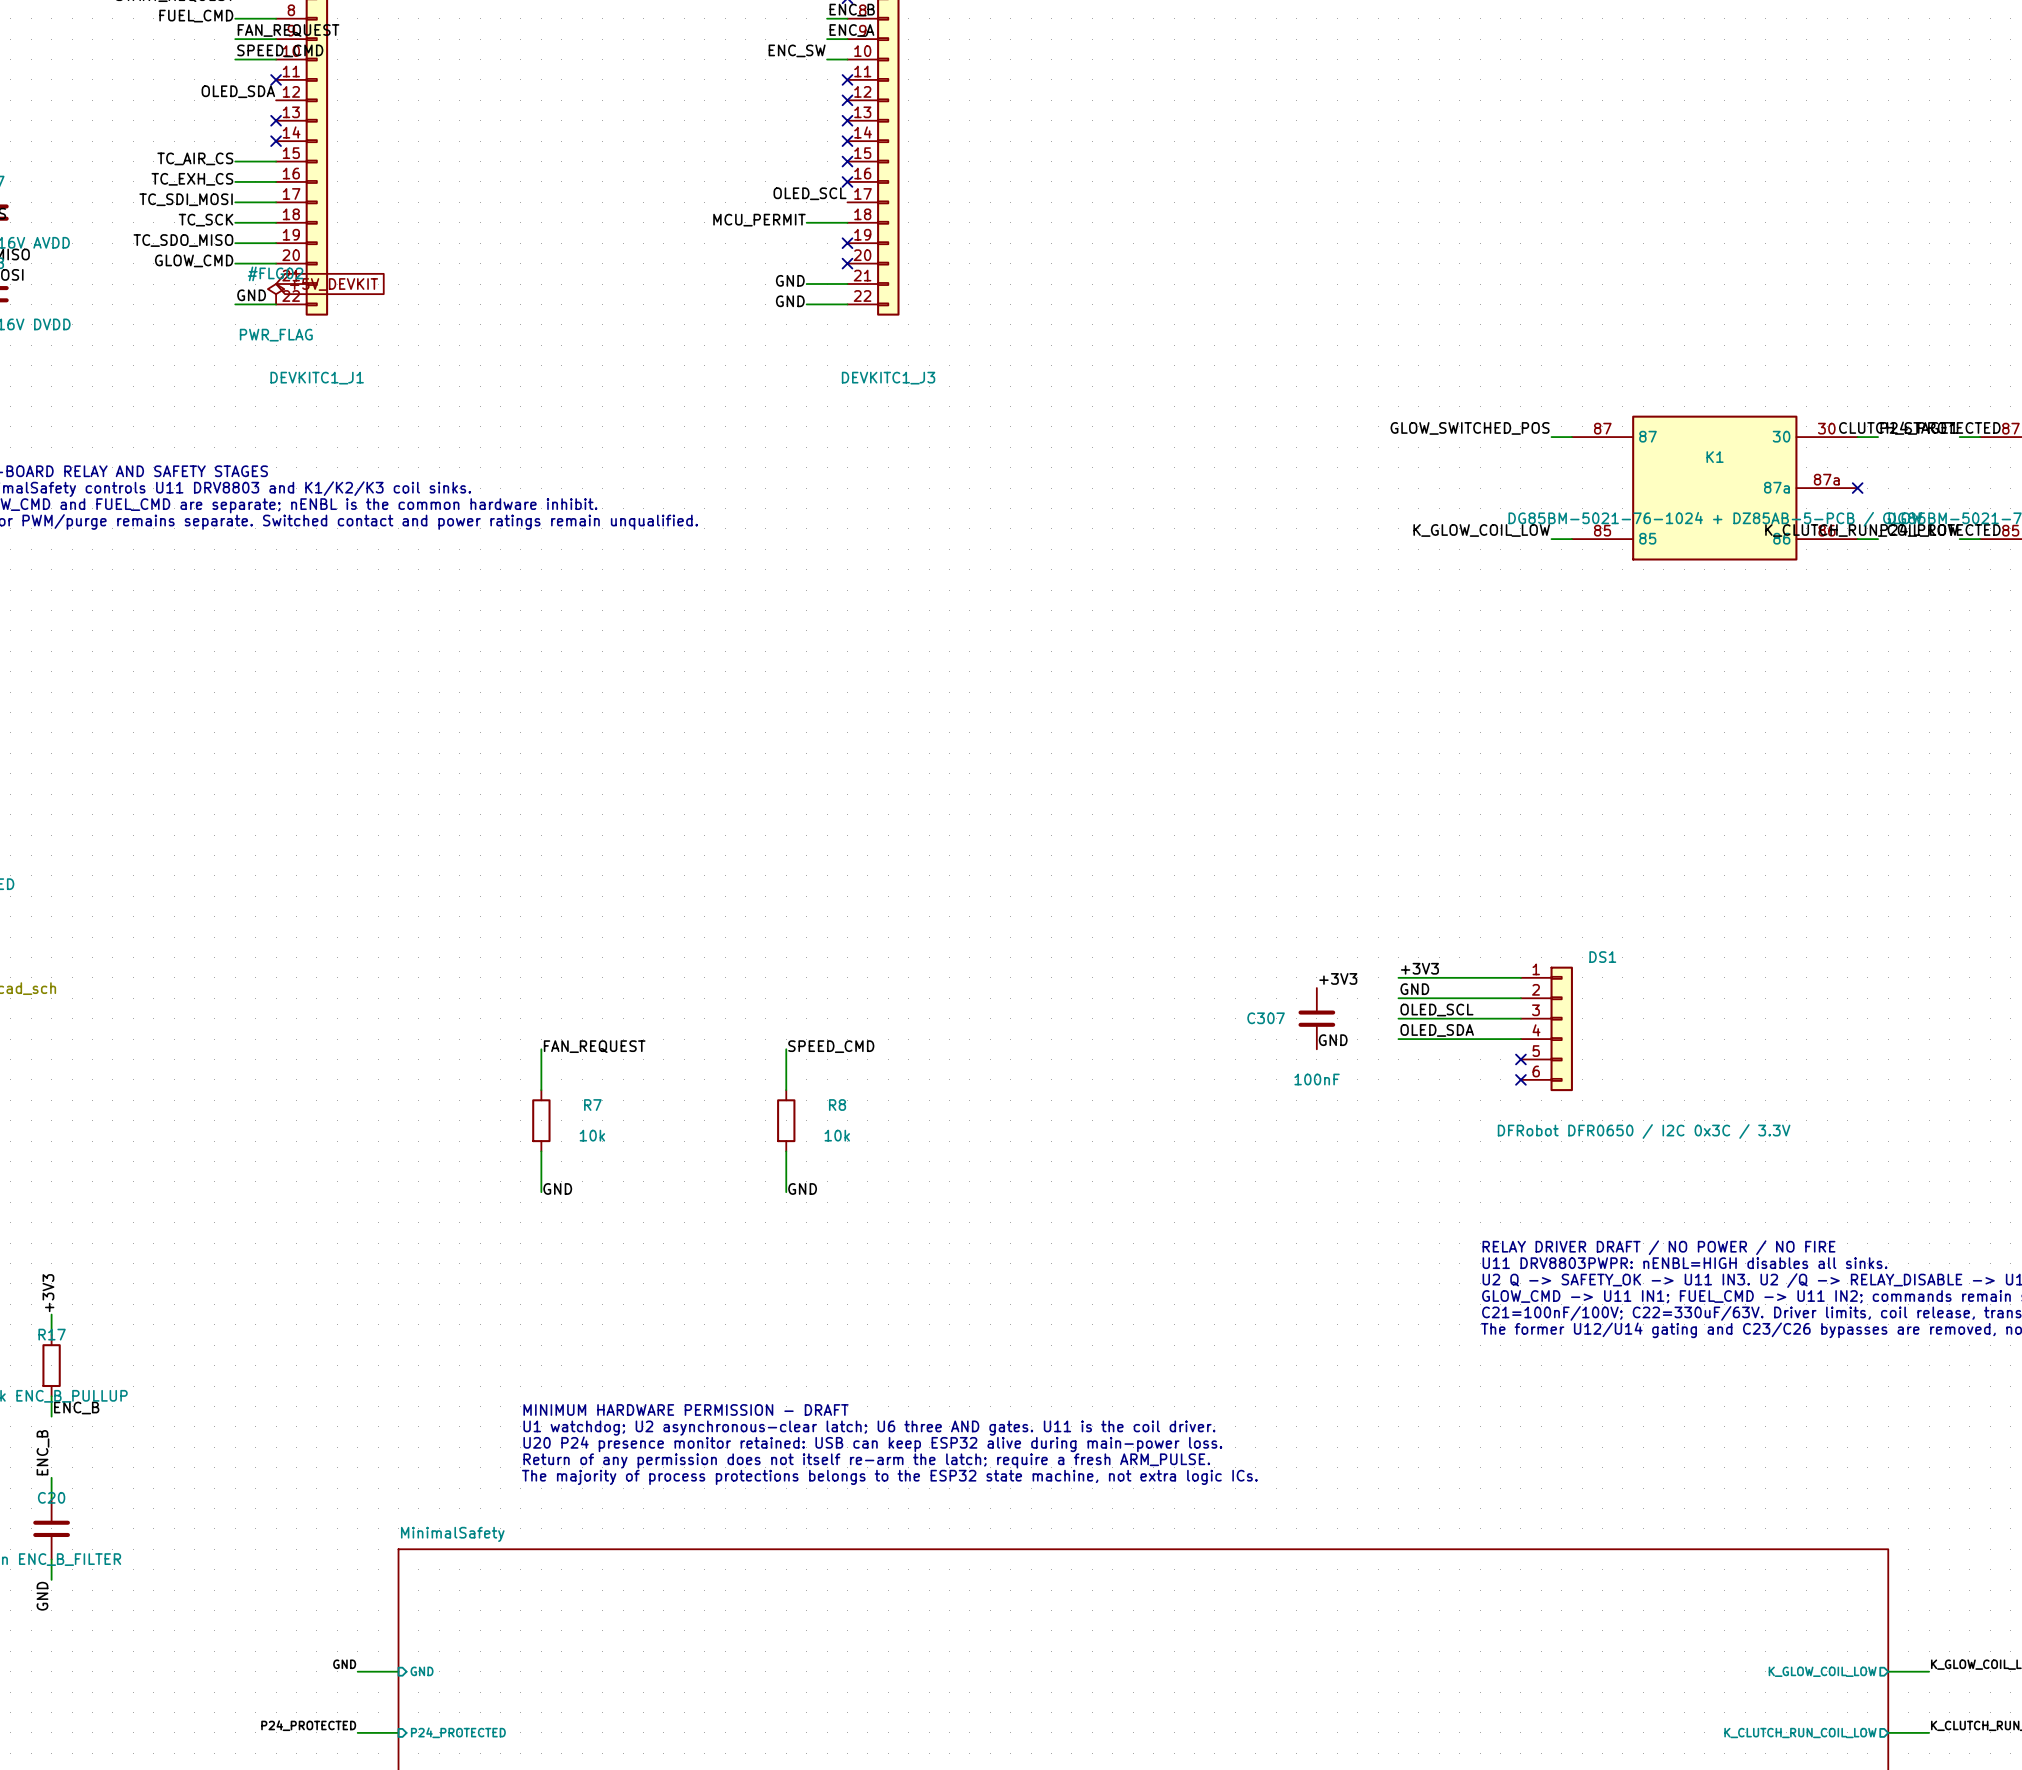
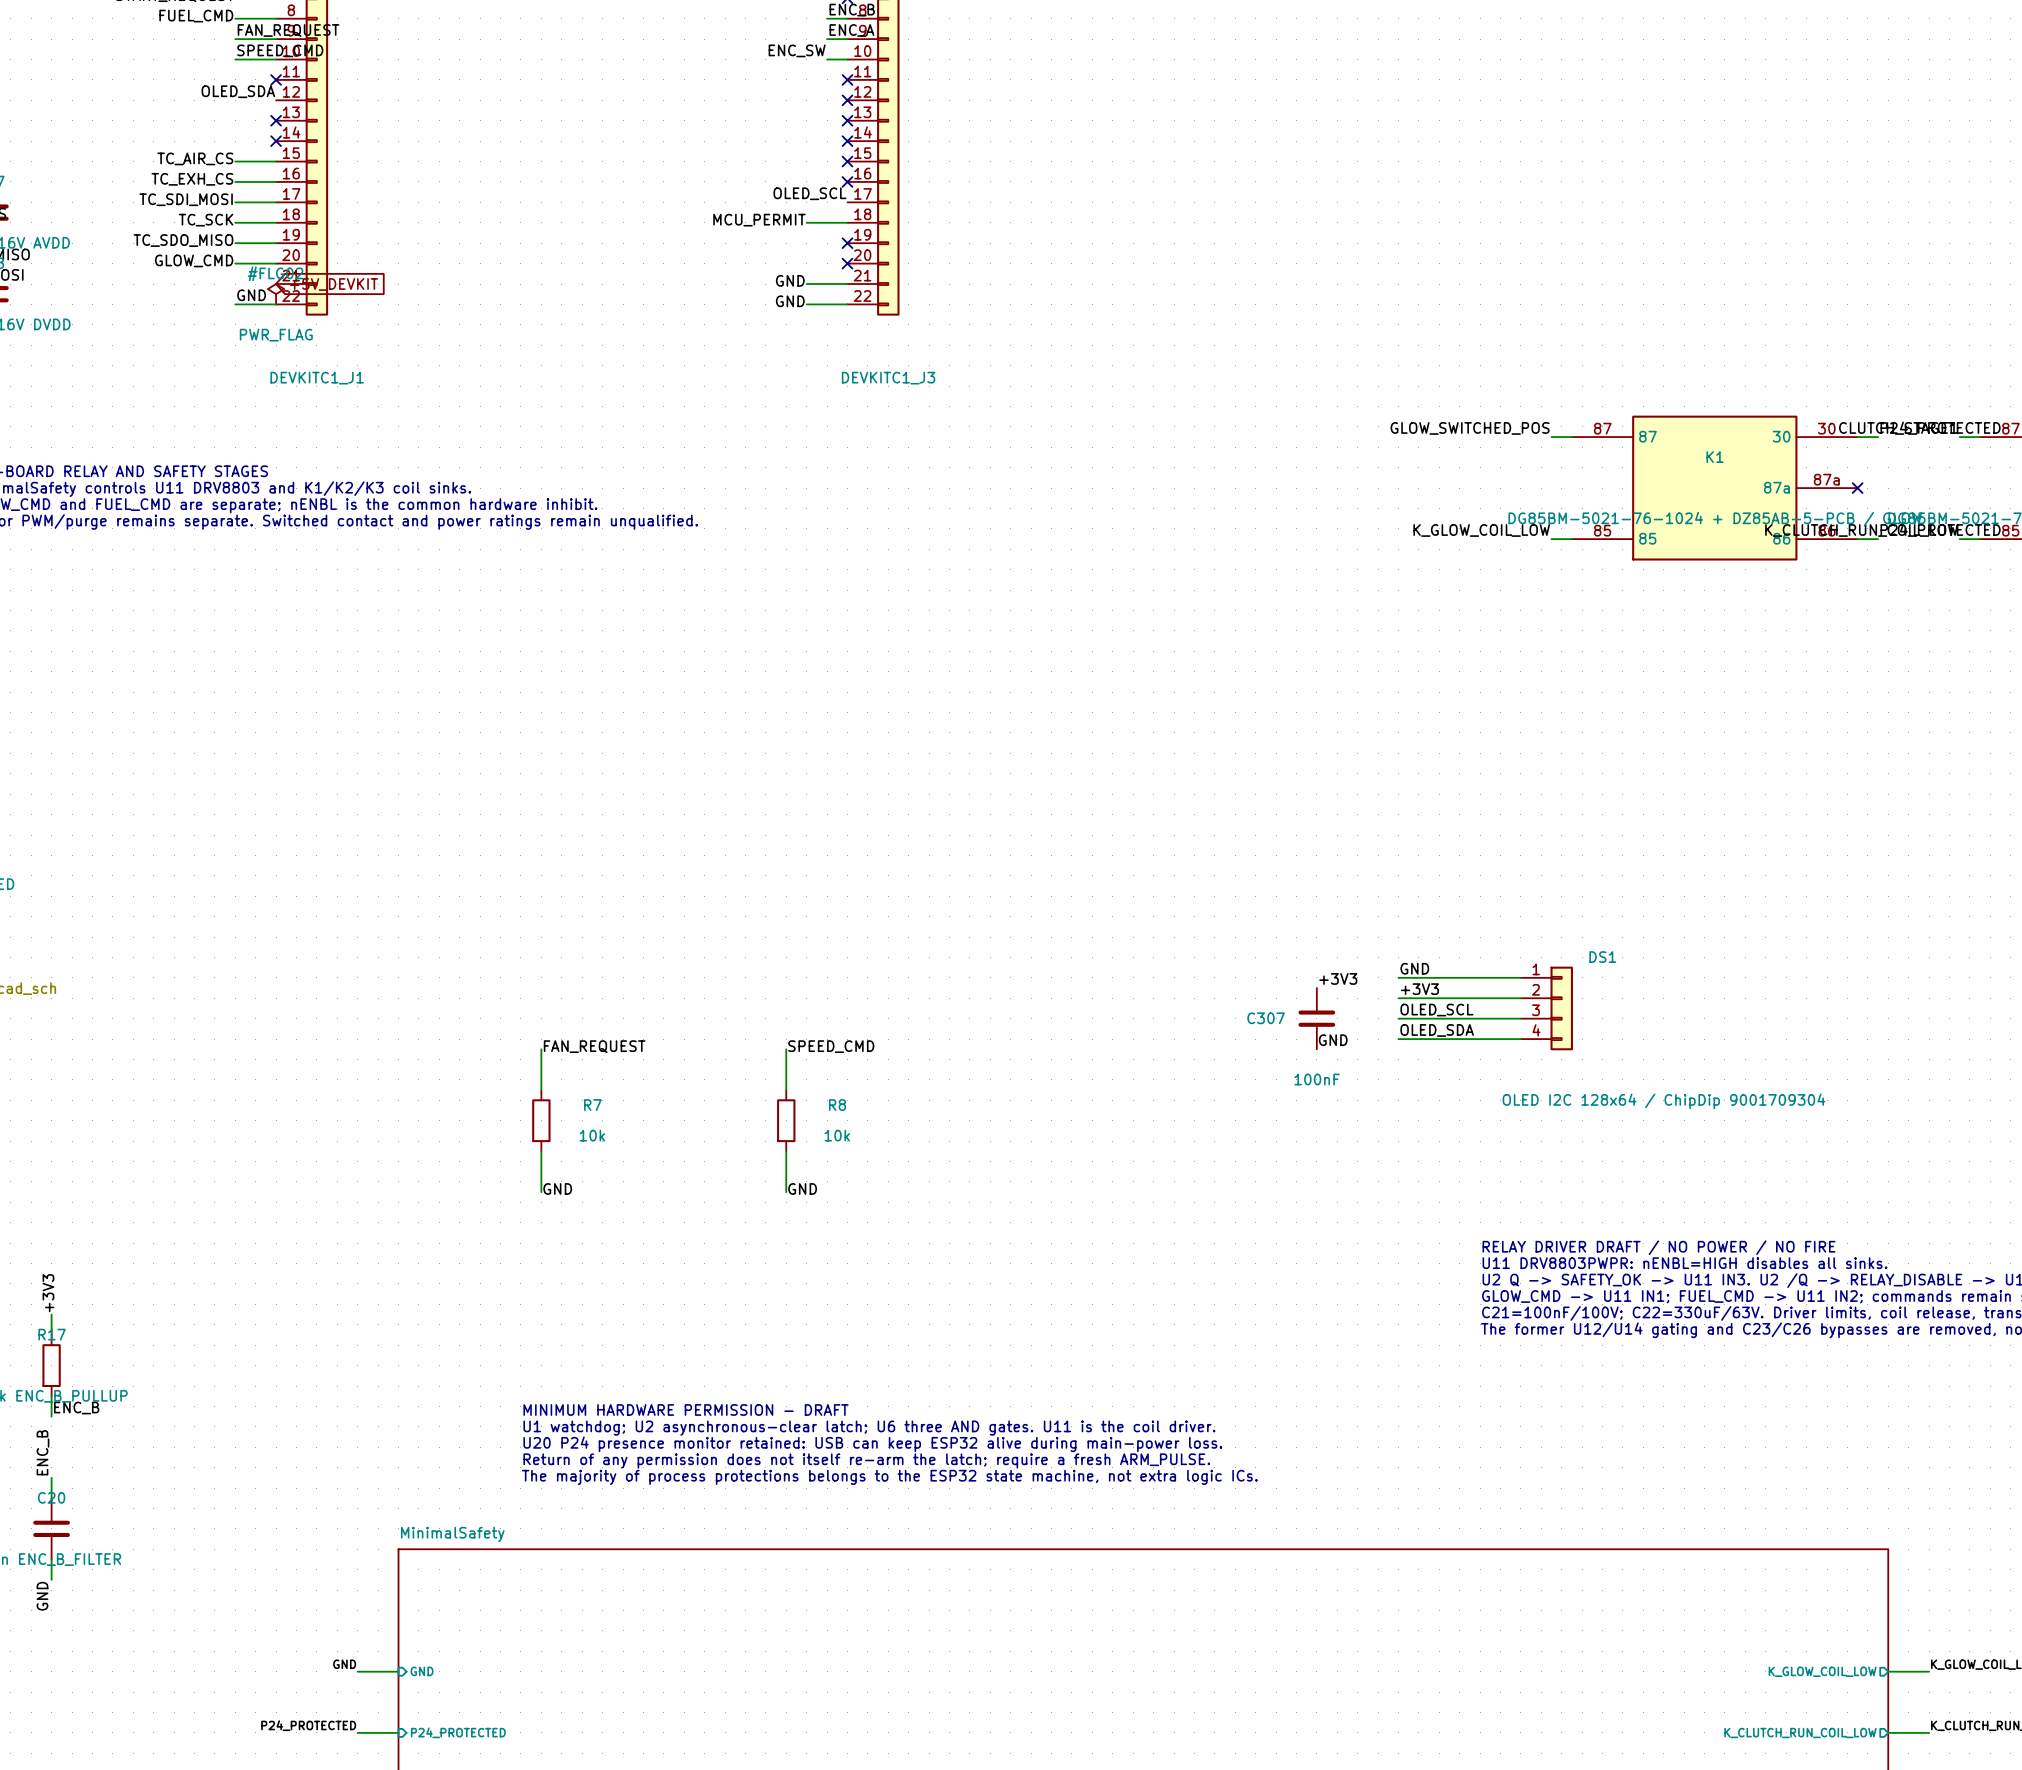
DS1 symbol: [1520, 966, 1573, 1092] -> [1520, 966, 1573, 1051]
label: +3V3 (1419, 968) -> GND (1414, 968)
label: GND (1414, 989) -> +3V3 (1419, 989)
no-connect mark: (1520, 1059) -> none
no-connect mark: (1520, 1079) -> none
DS1 value: DFRobot DFR0650 / I2C 0x3C / 3.3V (1644, 1131) -> OLED I2C 128x64 / ChipDip 9001709304 (1664, 1101)

